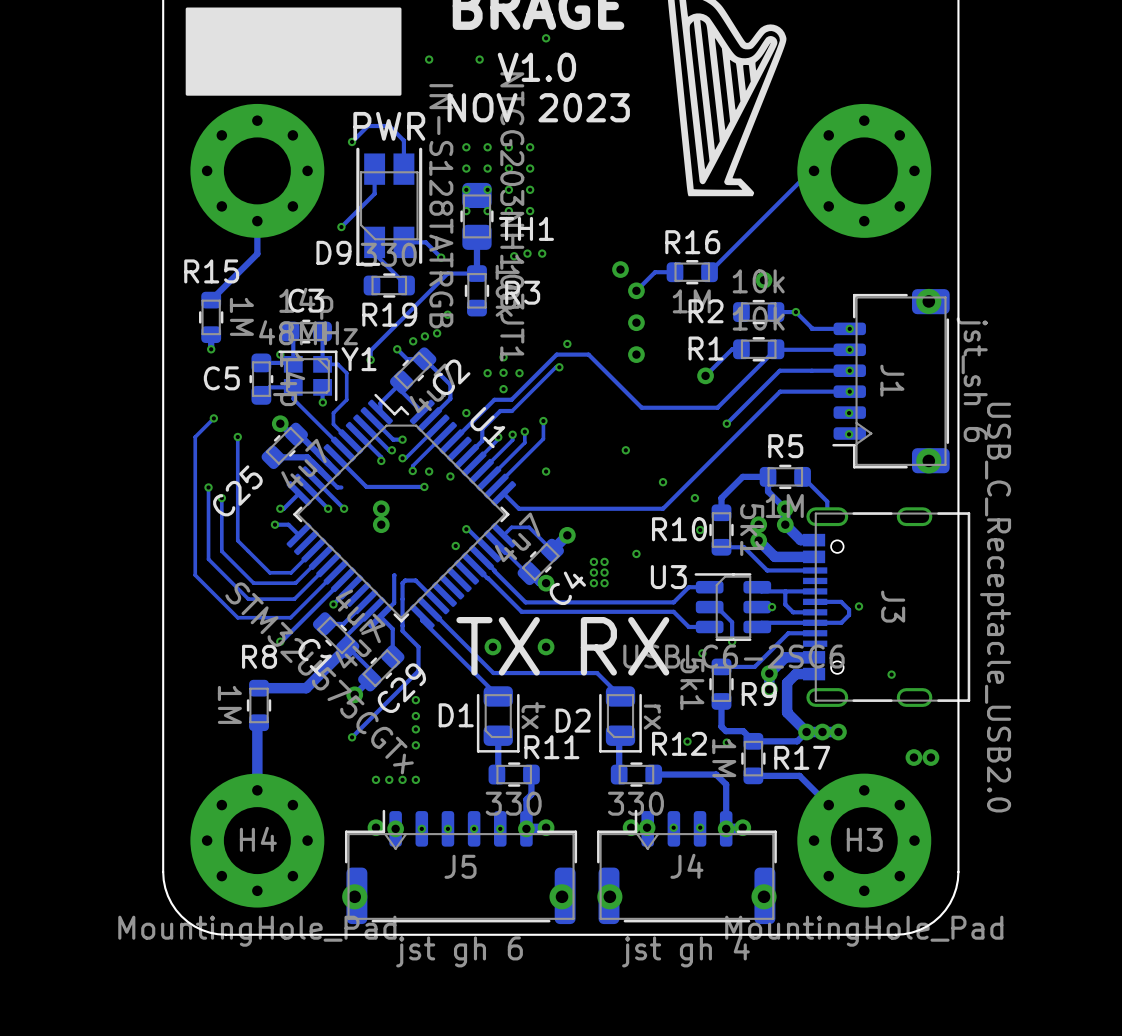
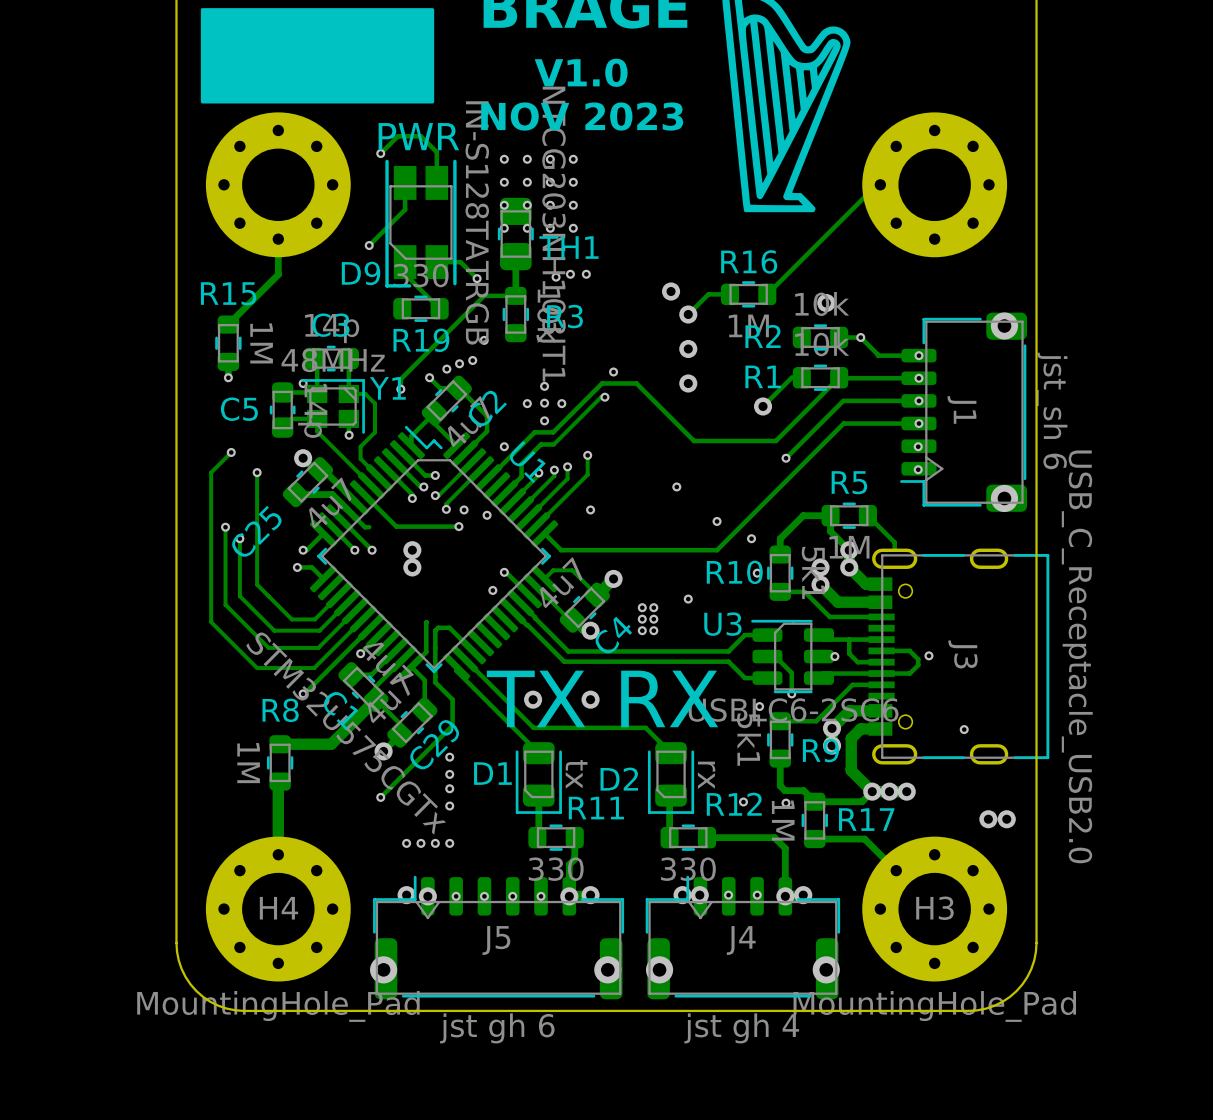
via: (546, 38) -> none
via: (429, 59) -> none
via: (479, 59) -> none

